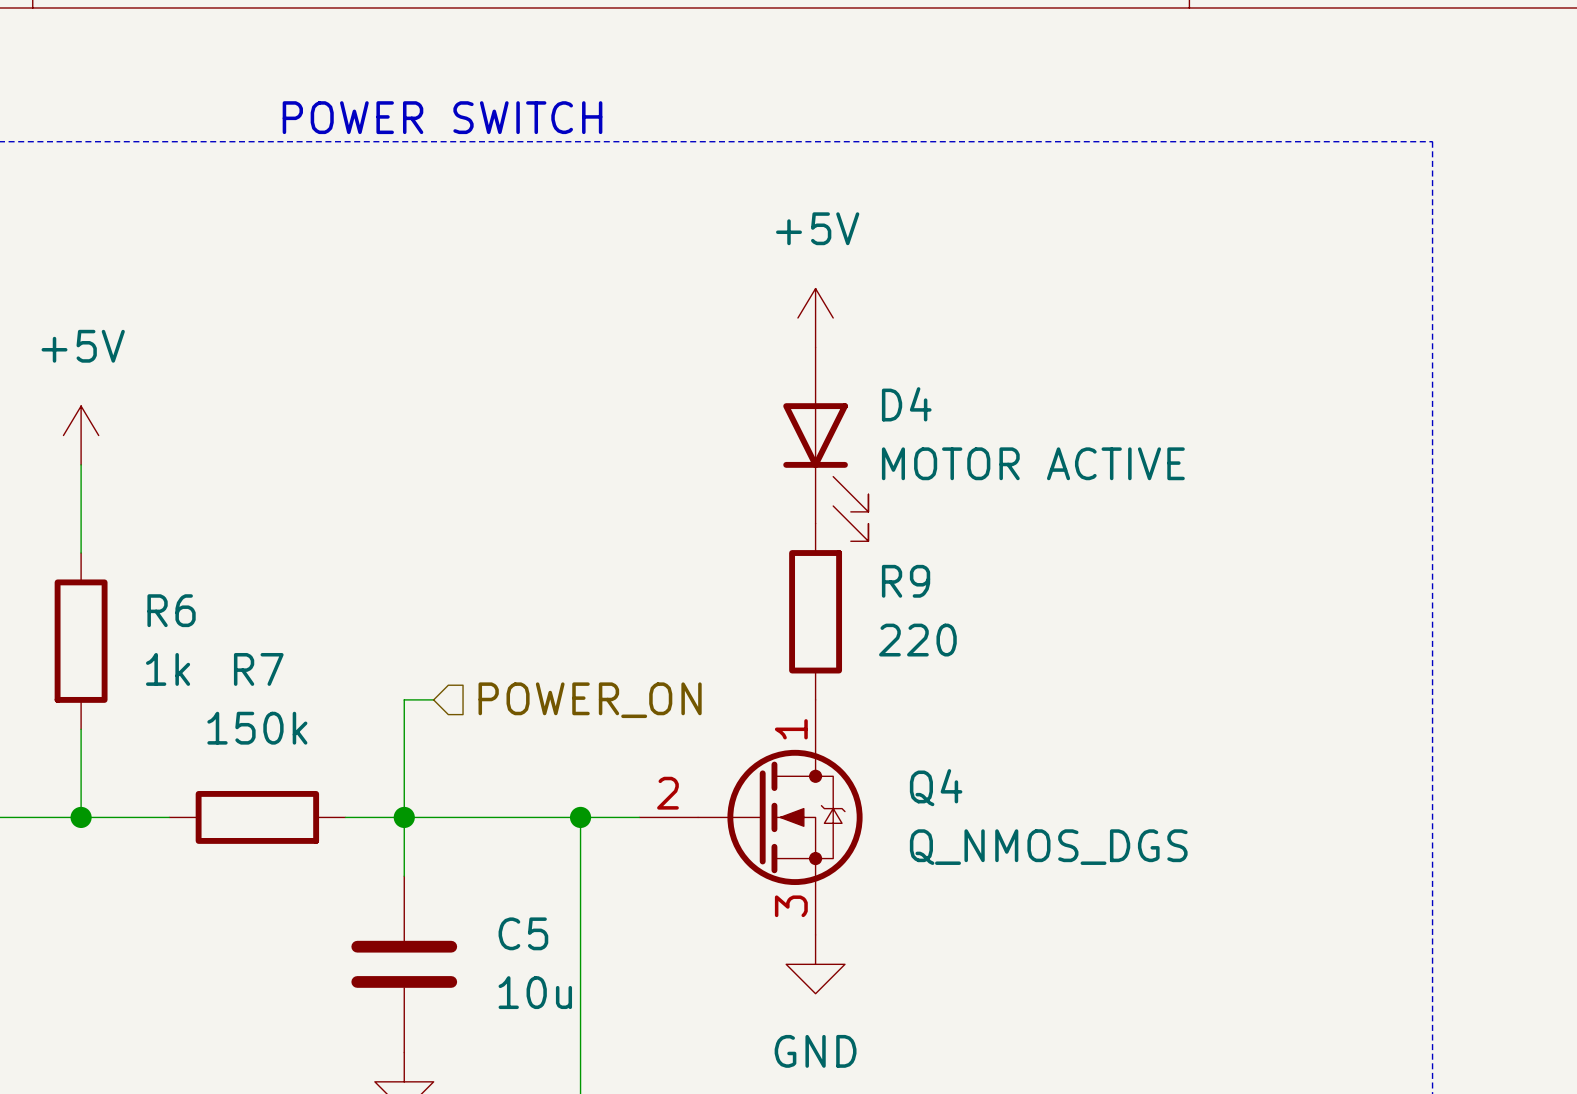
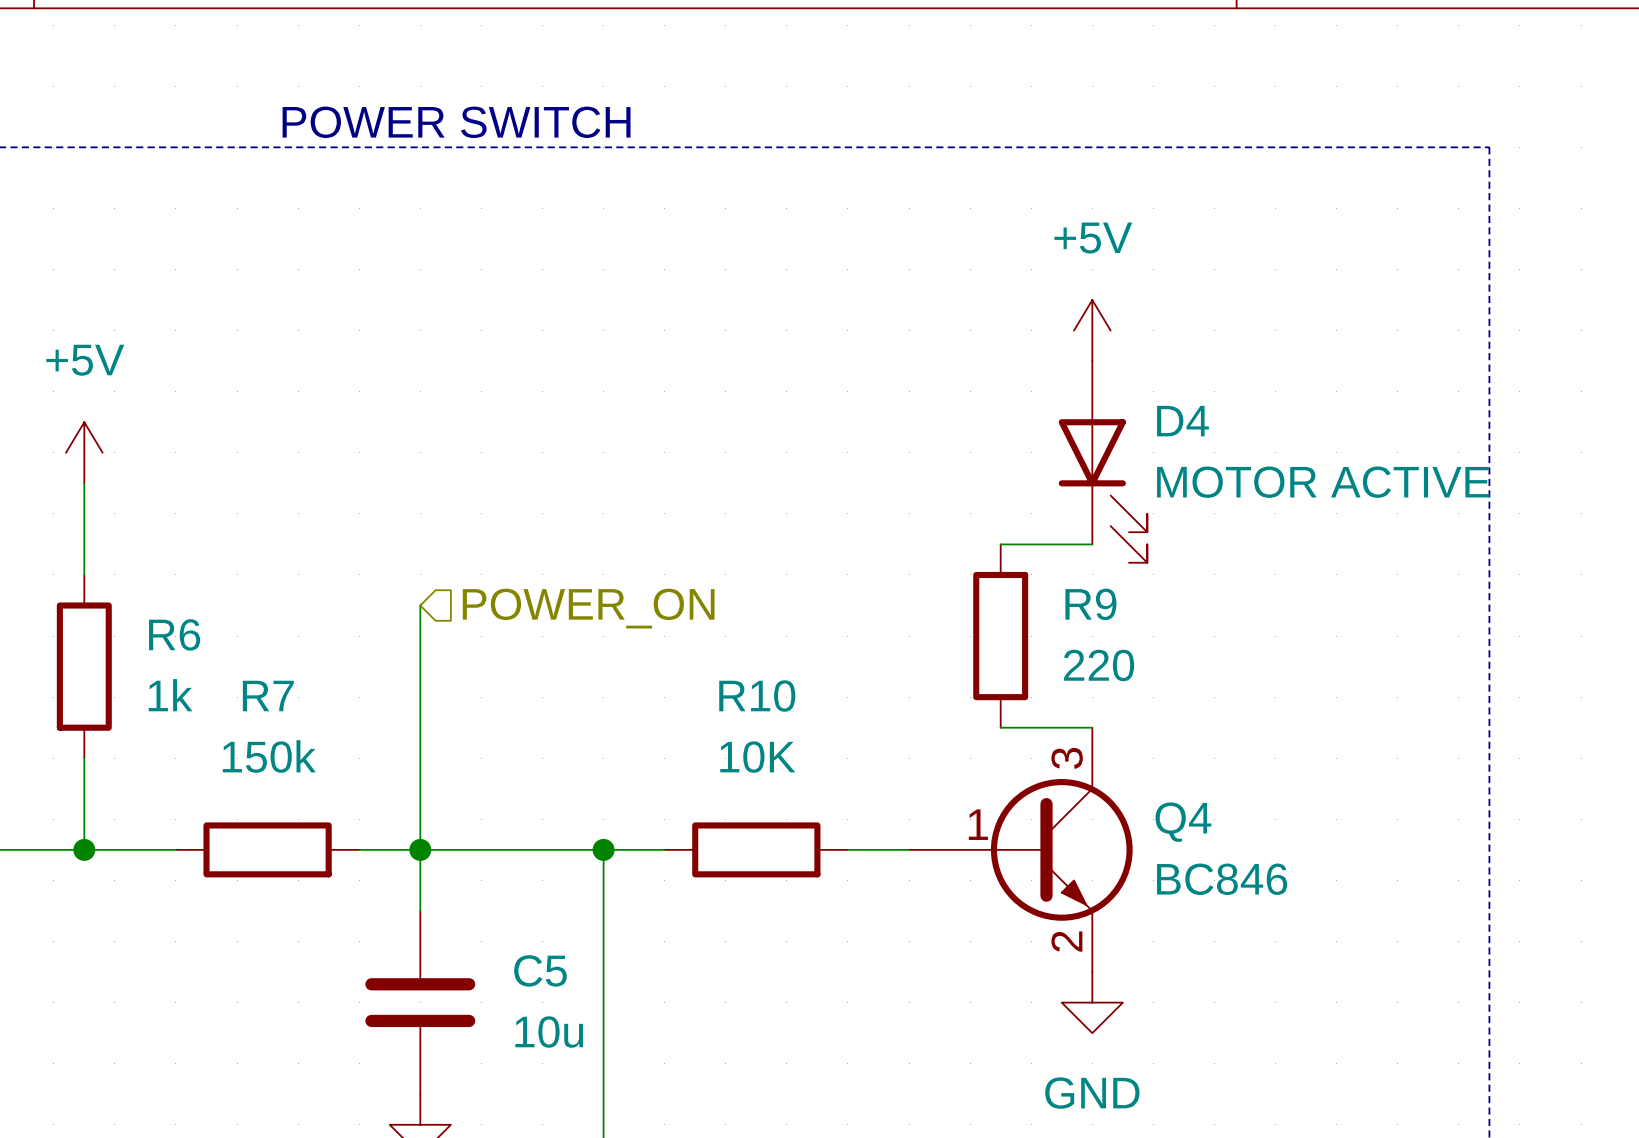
power symbol position: +5V (815, 317) -> +5V (1092, 330)
D4 position: (825, 444) -> (1103, 461)
wire: none -> (1000, 544) (1092, 544)
R9 position: (815, 611) -> (1000, 636)
wire: (404, 699) (433, 699) -> (420, 727) (420, 605)
Q4 symbol: [639, 699, 863, 935] -> [909, 727, 1133, 973]
wire: none -> (1000, 727) (1092, 727)
hierarchical label position: POWER_ON (590, 700) -> POWER_ON (588, 608)
R10: none -> 10K (756, 849)
wire: none -> (847, 849) (909, 849)
Q4 value: Q_NMOS_DGS (1048, 847) -> BC846 (1222, 879)
power symbol position: GND (815, 964) -> GND (1092, 1002)

